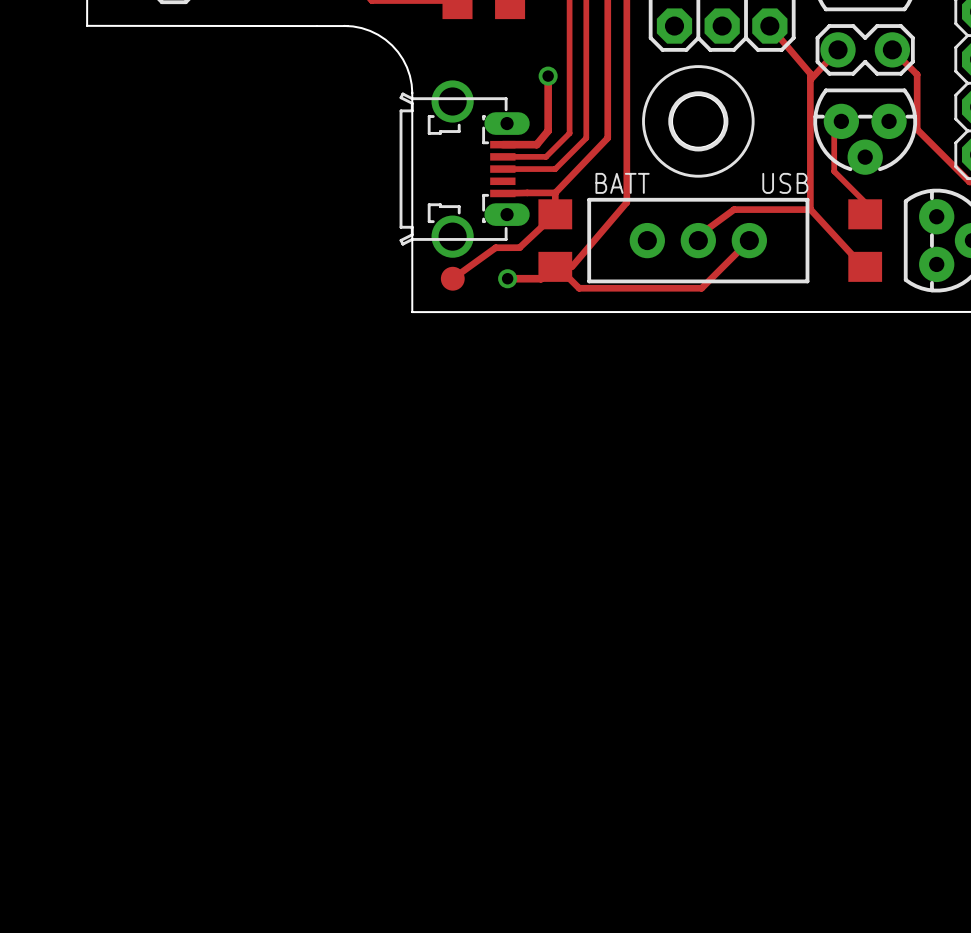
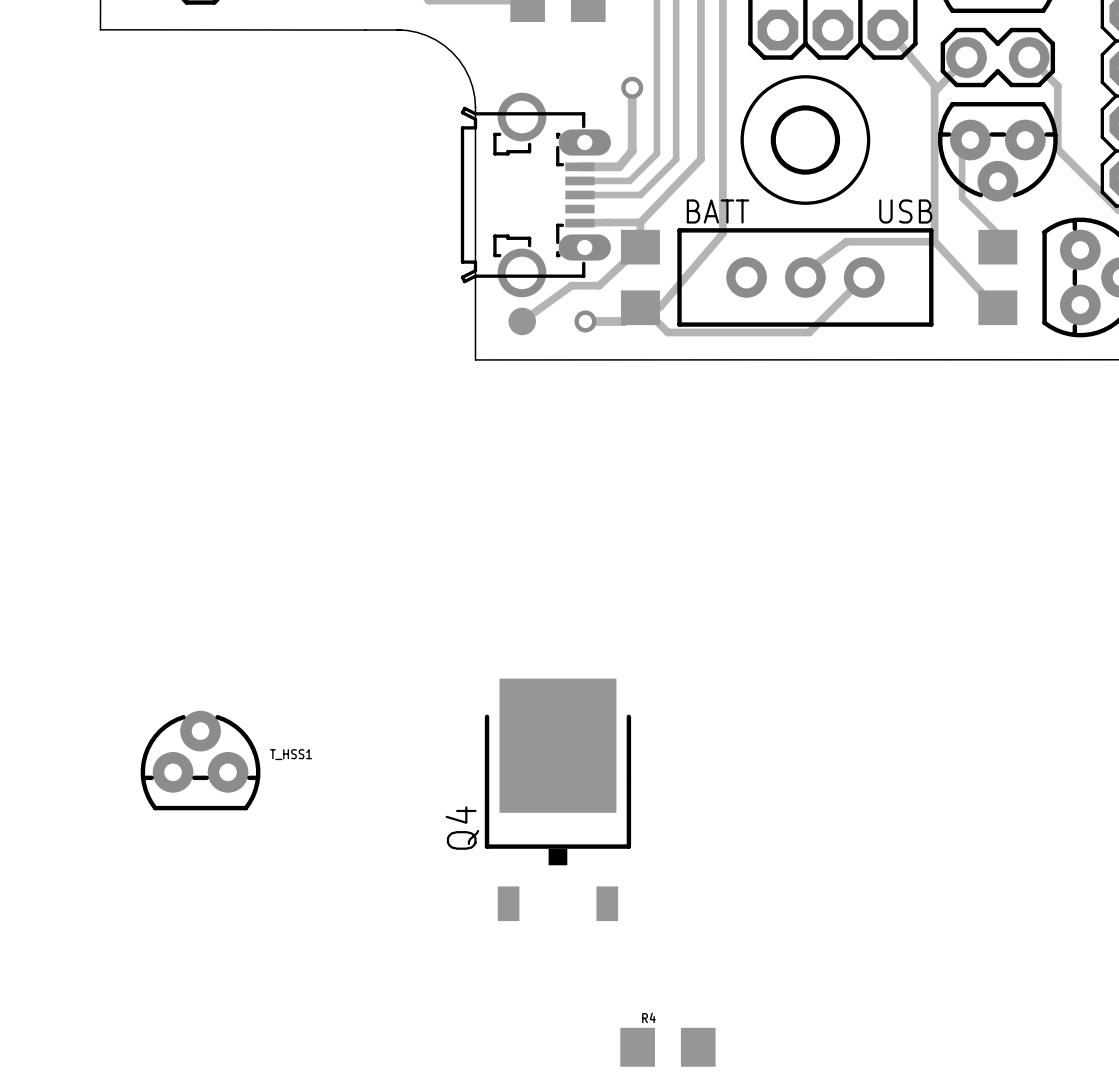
T_HSS1: none -> (200, 760)
Q4: none -> (557, 799)
R4: none -> (667, 1047)

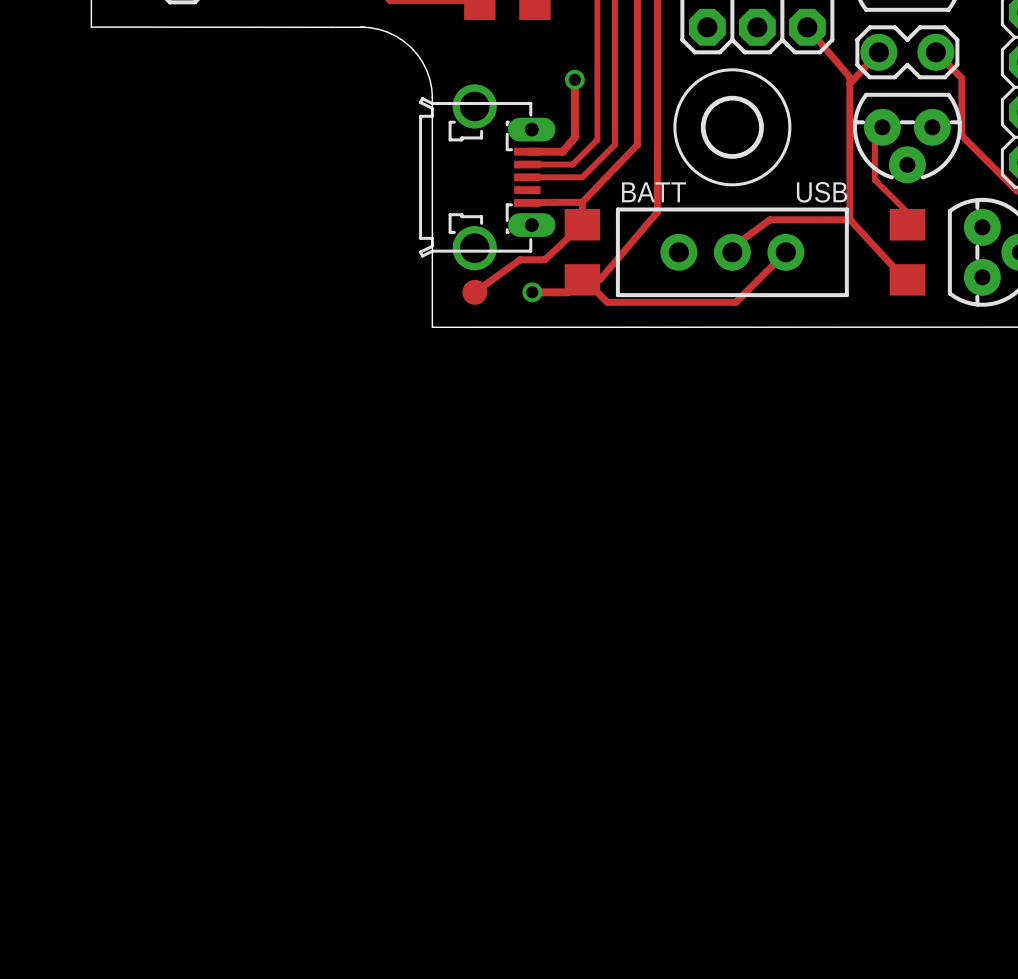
T_HSS1: (200, 760) -> none
Q4: (557, 799) -> none
R4: (667, 1047) -> none

